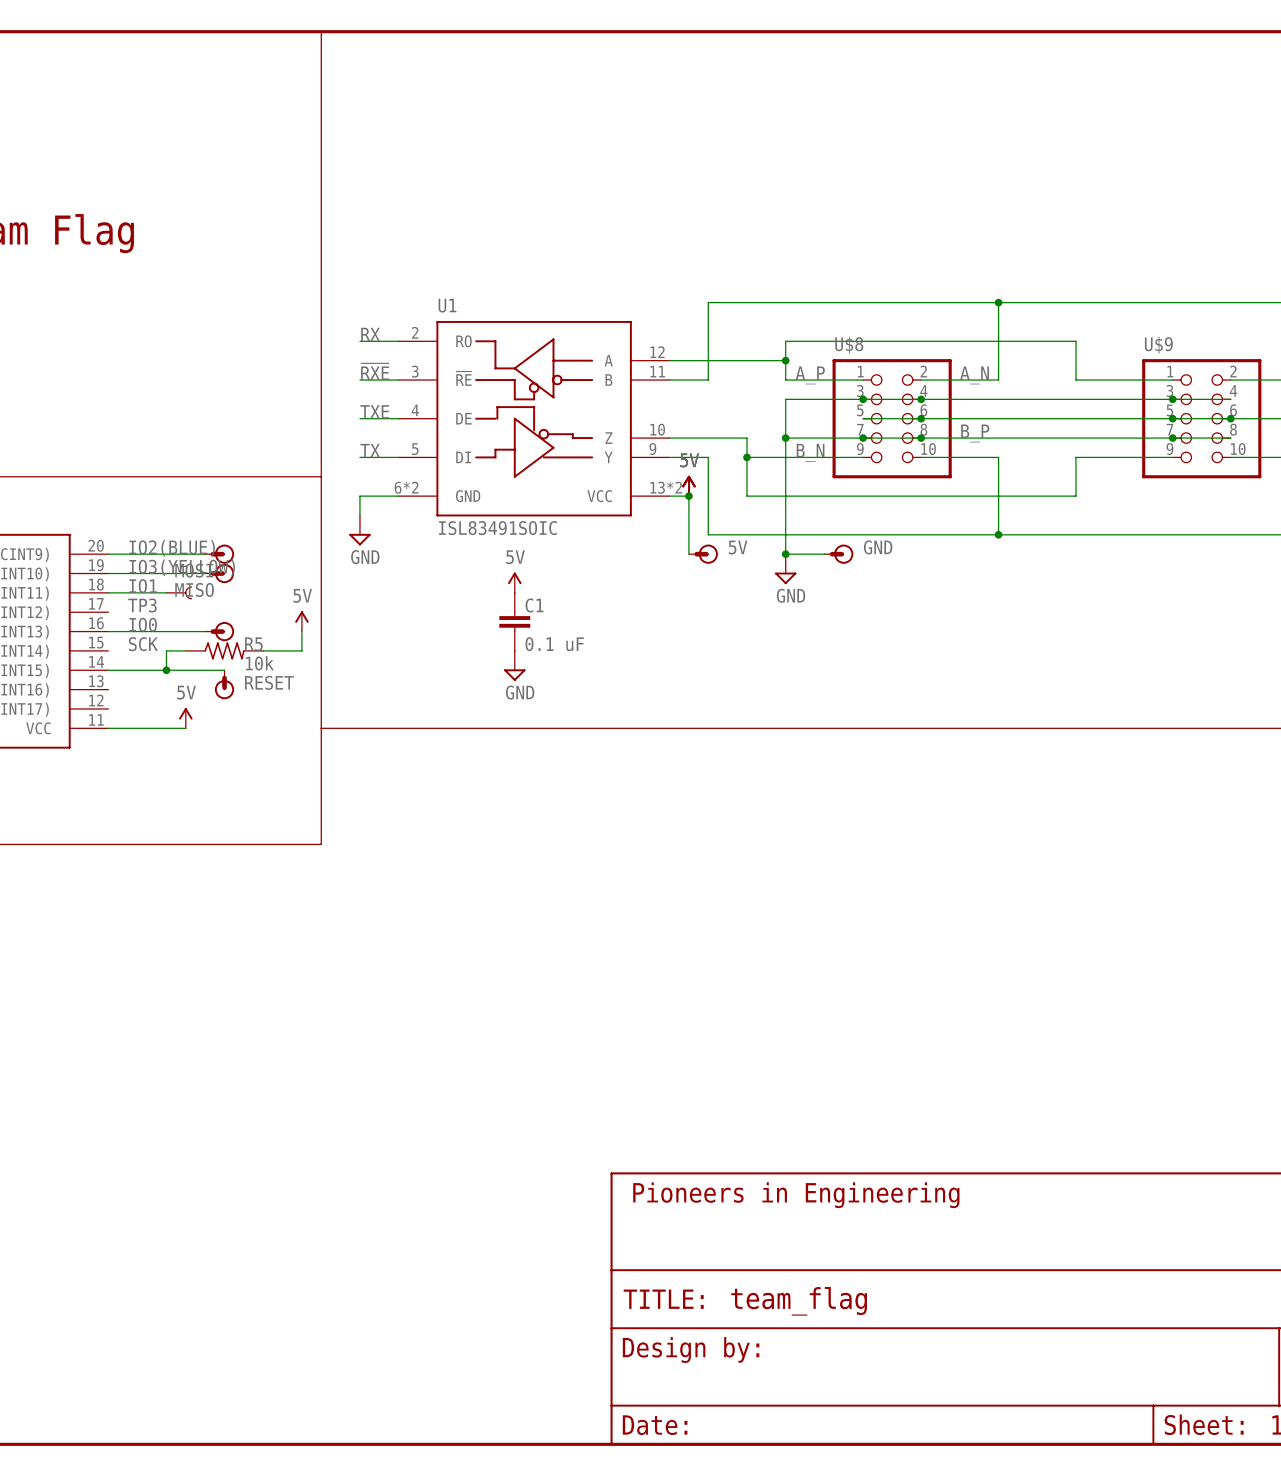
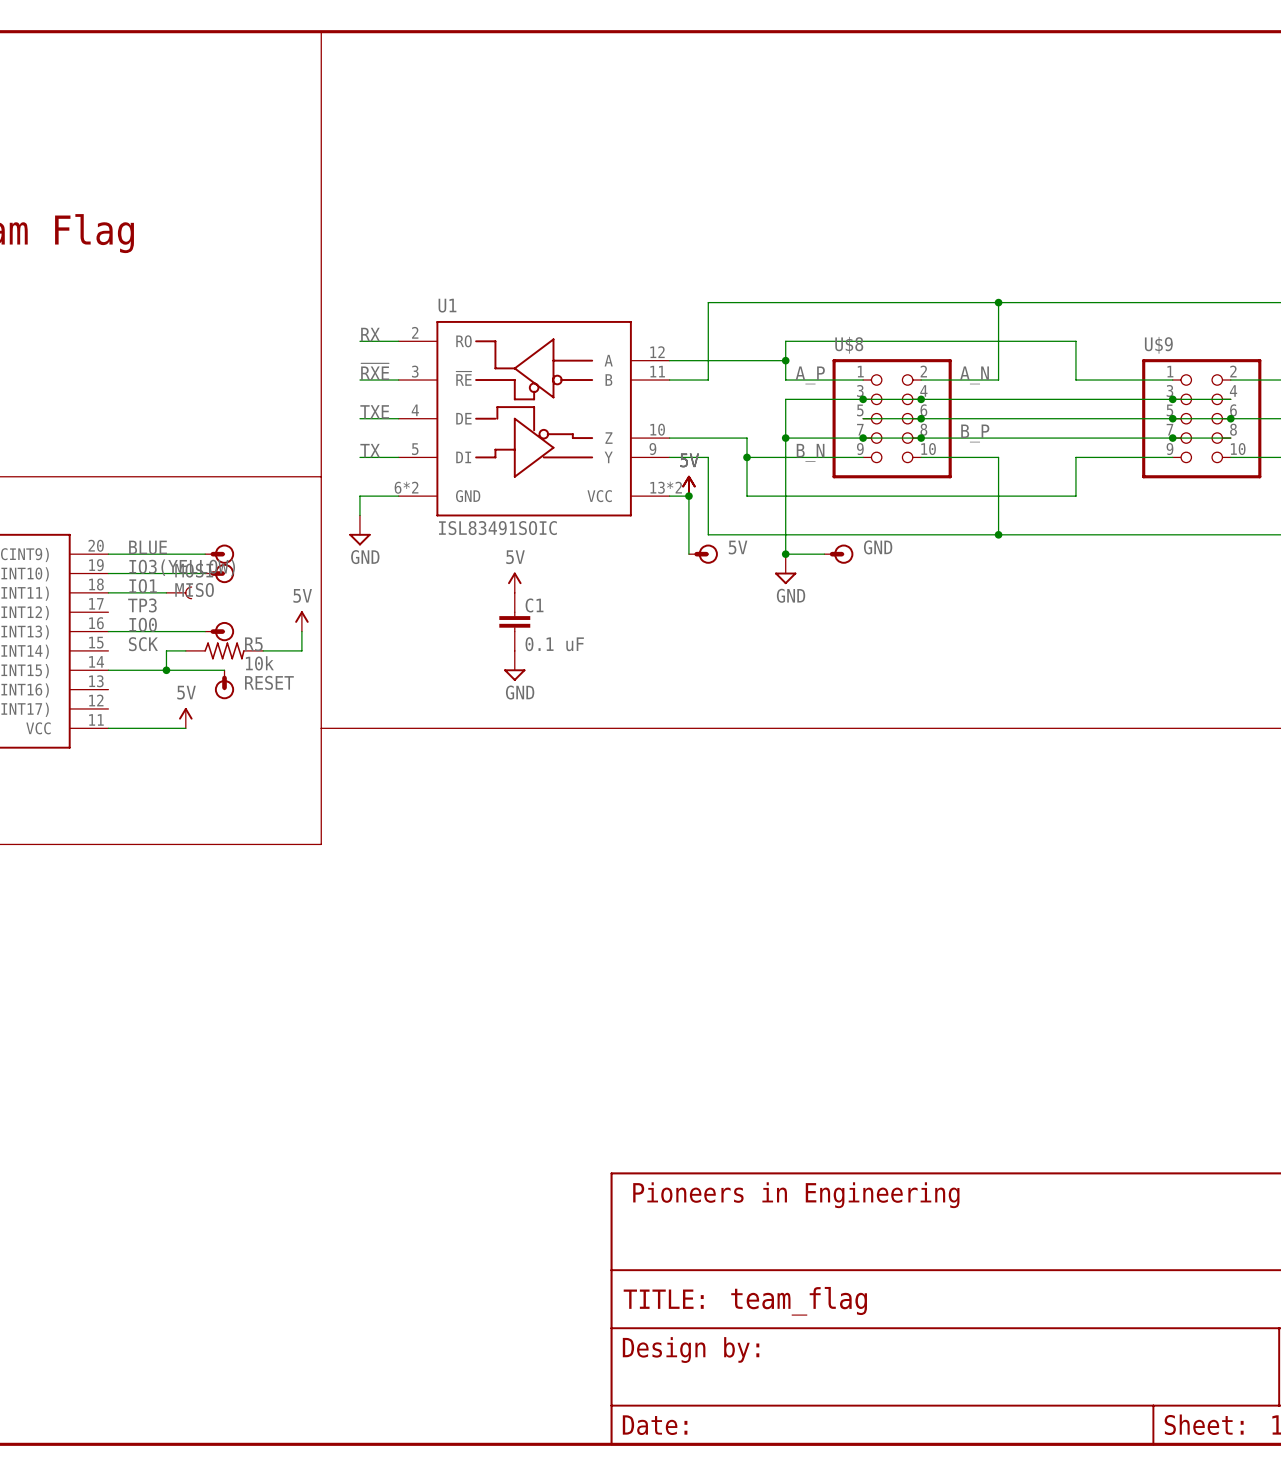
label: IO2(BLUE) (172, 548) -> BLUE (148, 547)

